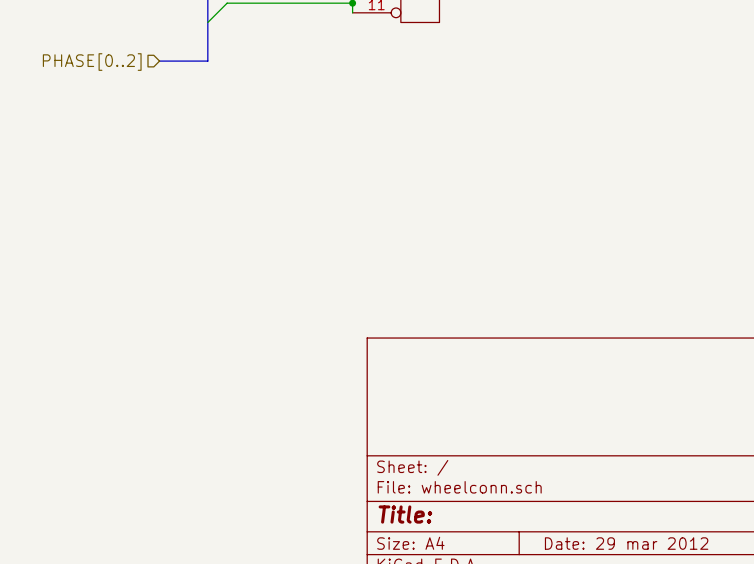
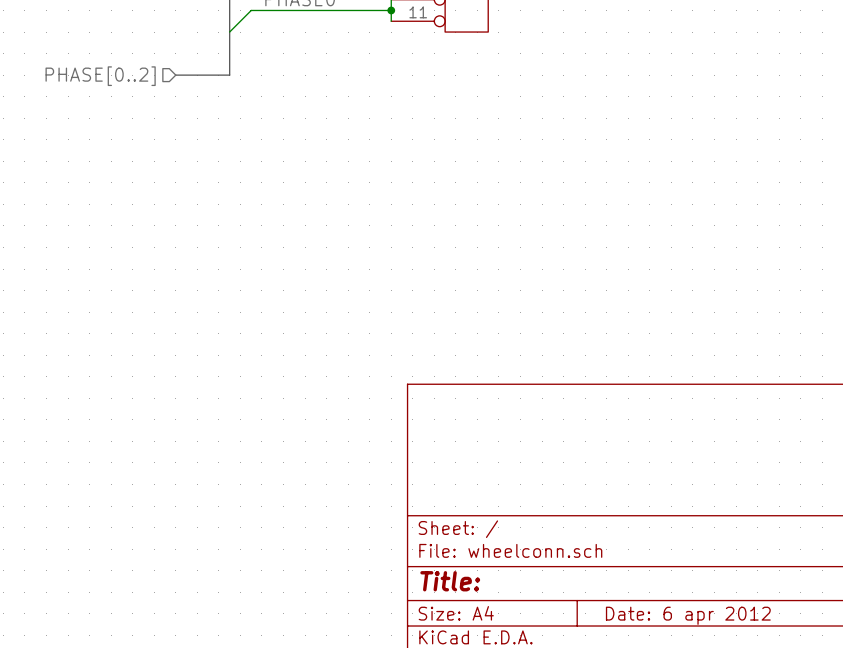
title block: Date: 29 mar 2012 (626, 543) -> Date: 6 apr 2012 (688, 615)

